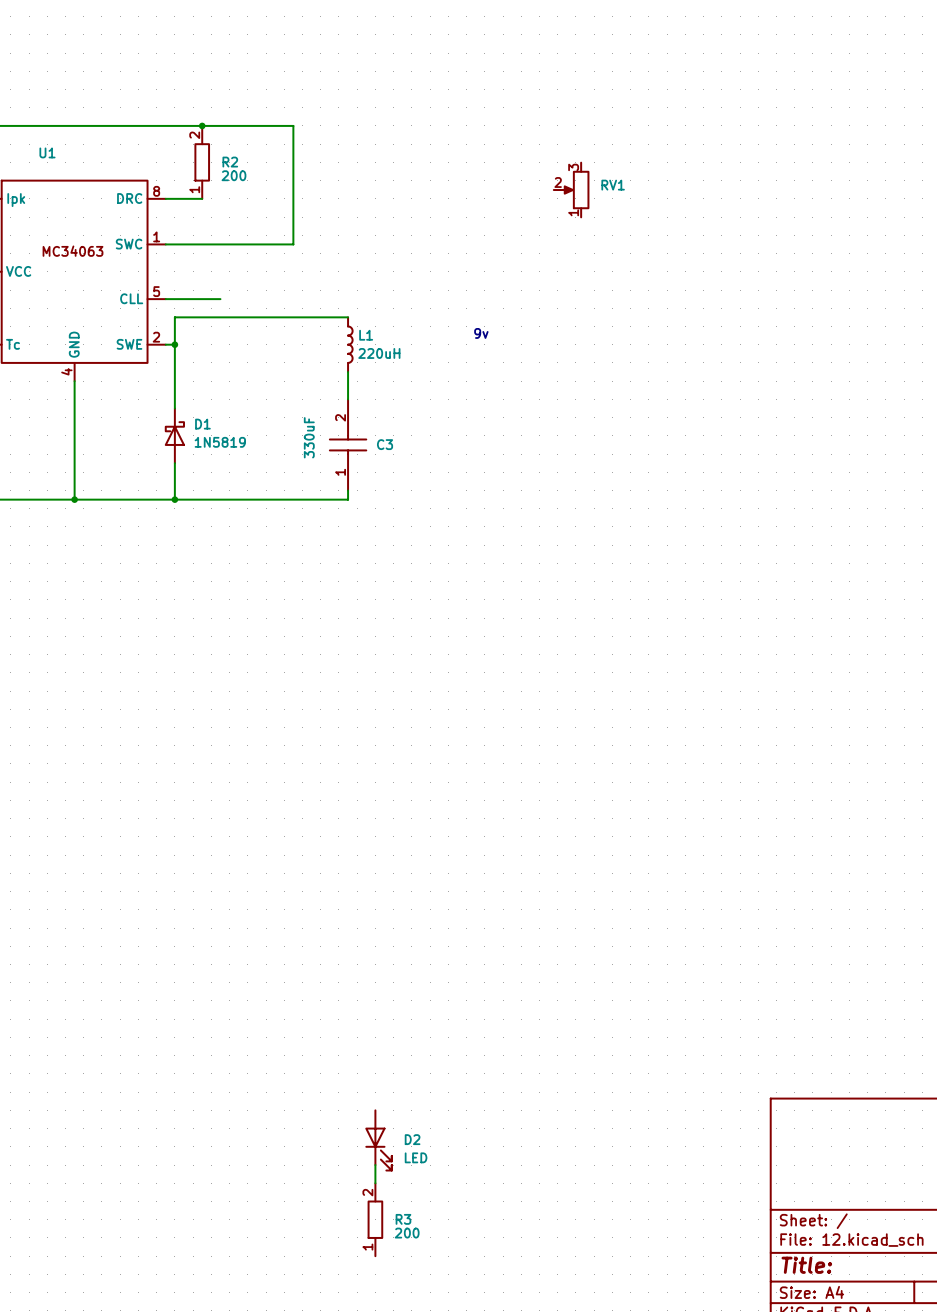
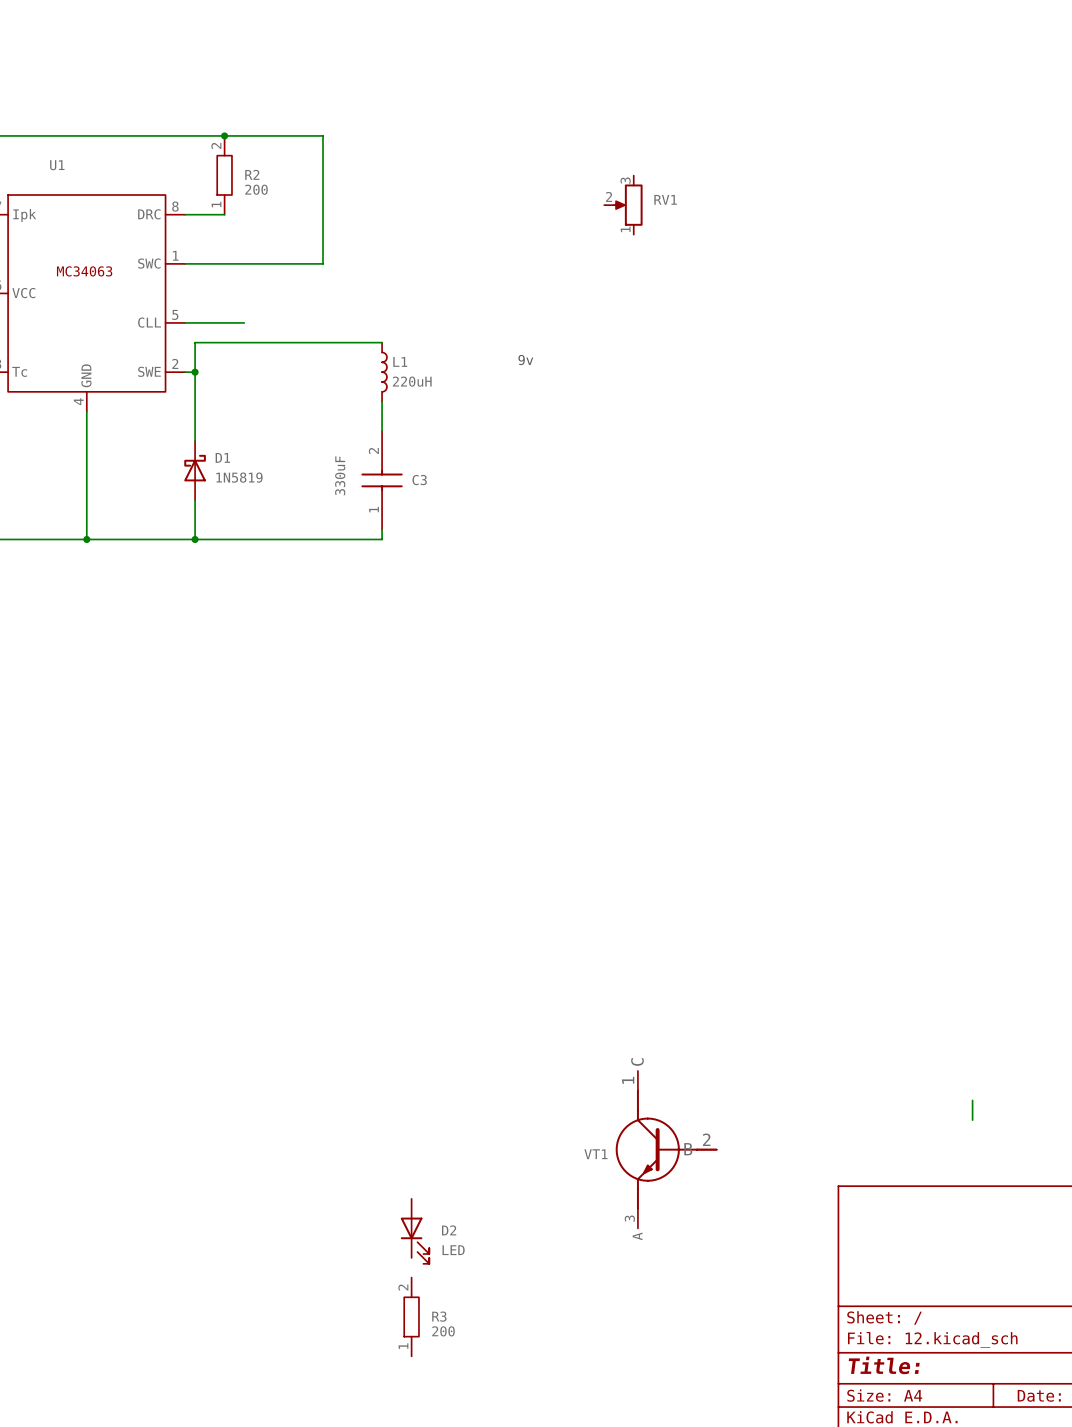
wire: none -> (972, 1100) (972, 1120)
VT1: none -> (666, 1149)
wire: (375, 1165) (375, 1183) -> none

